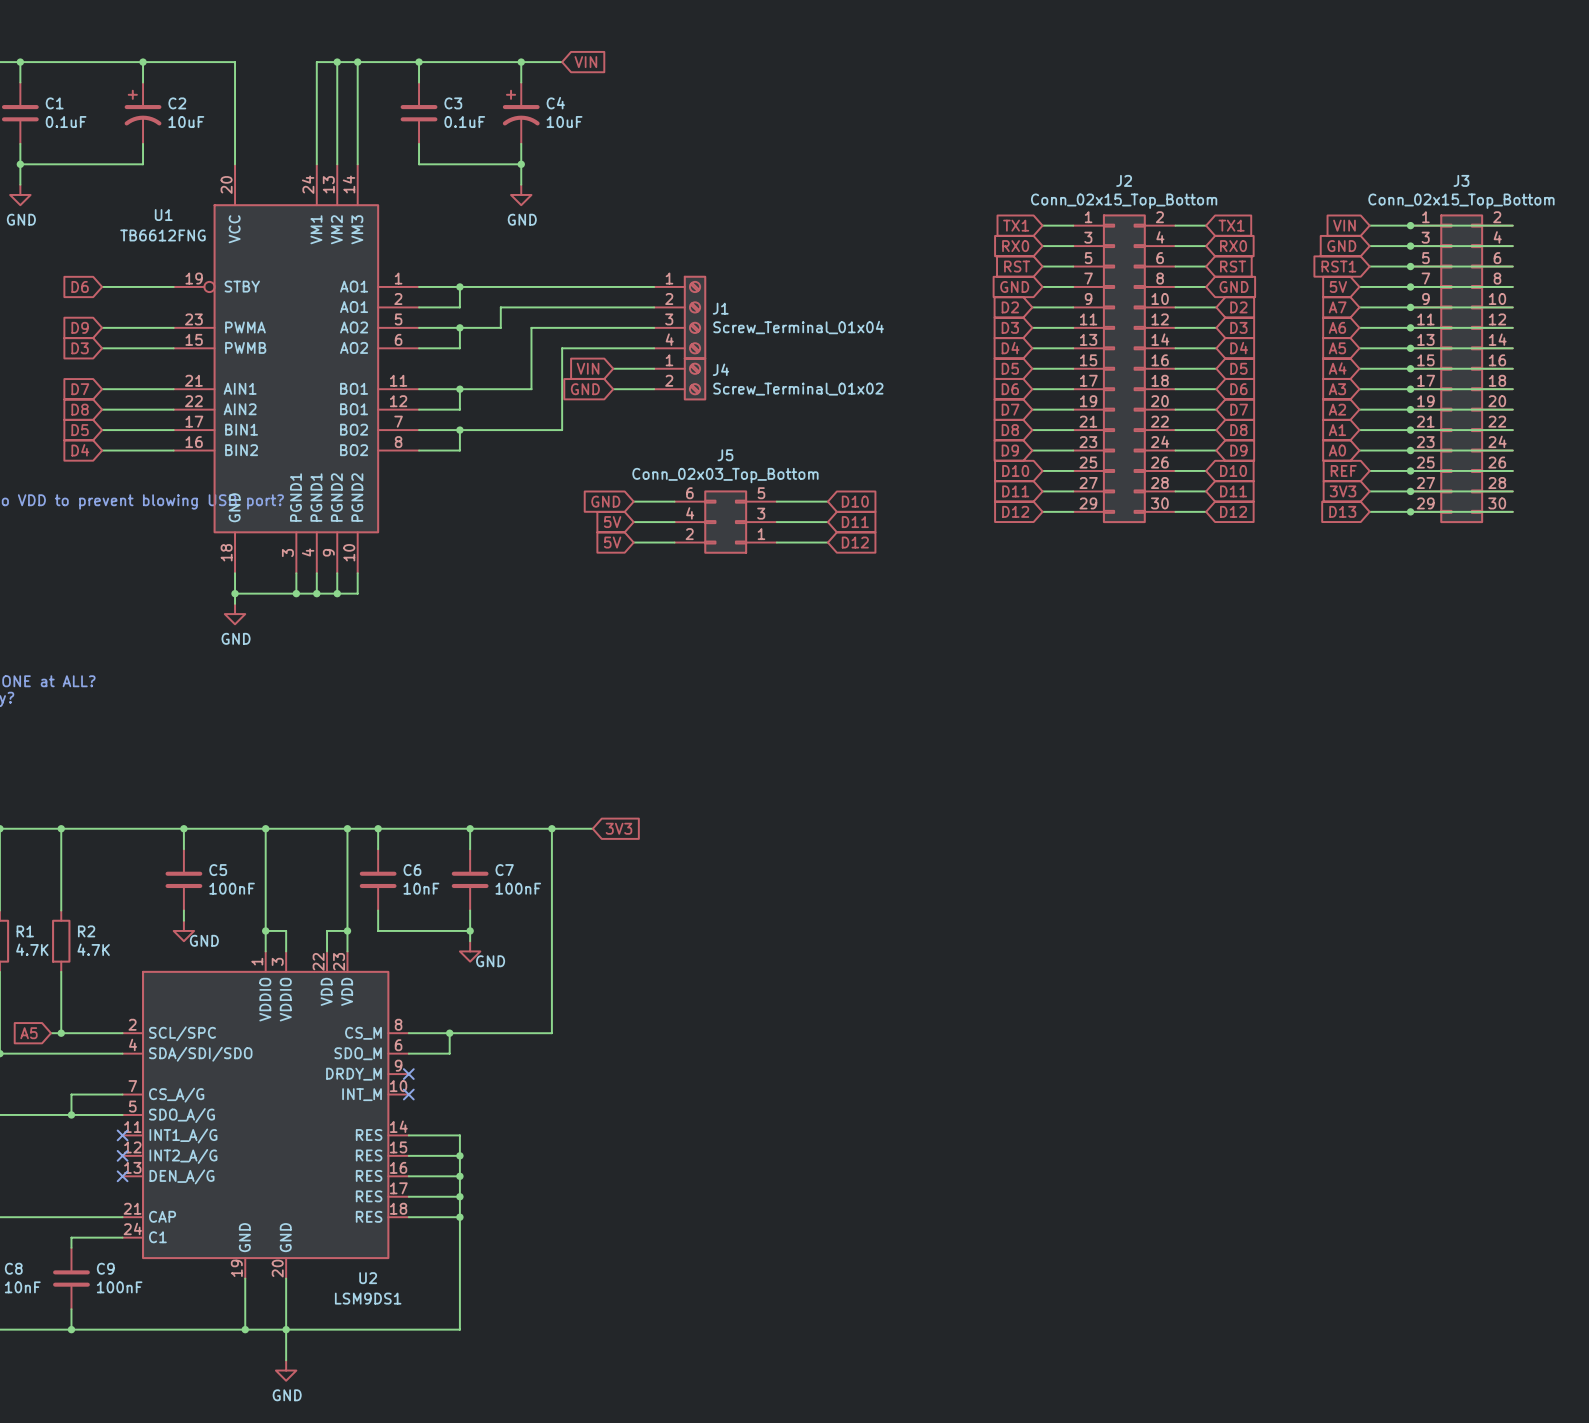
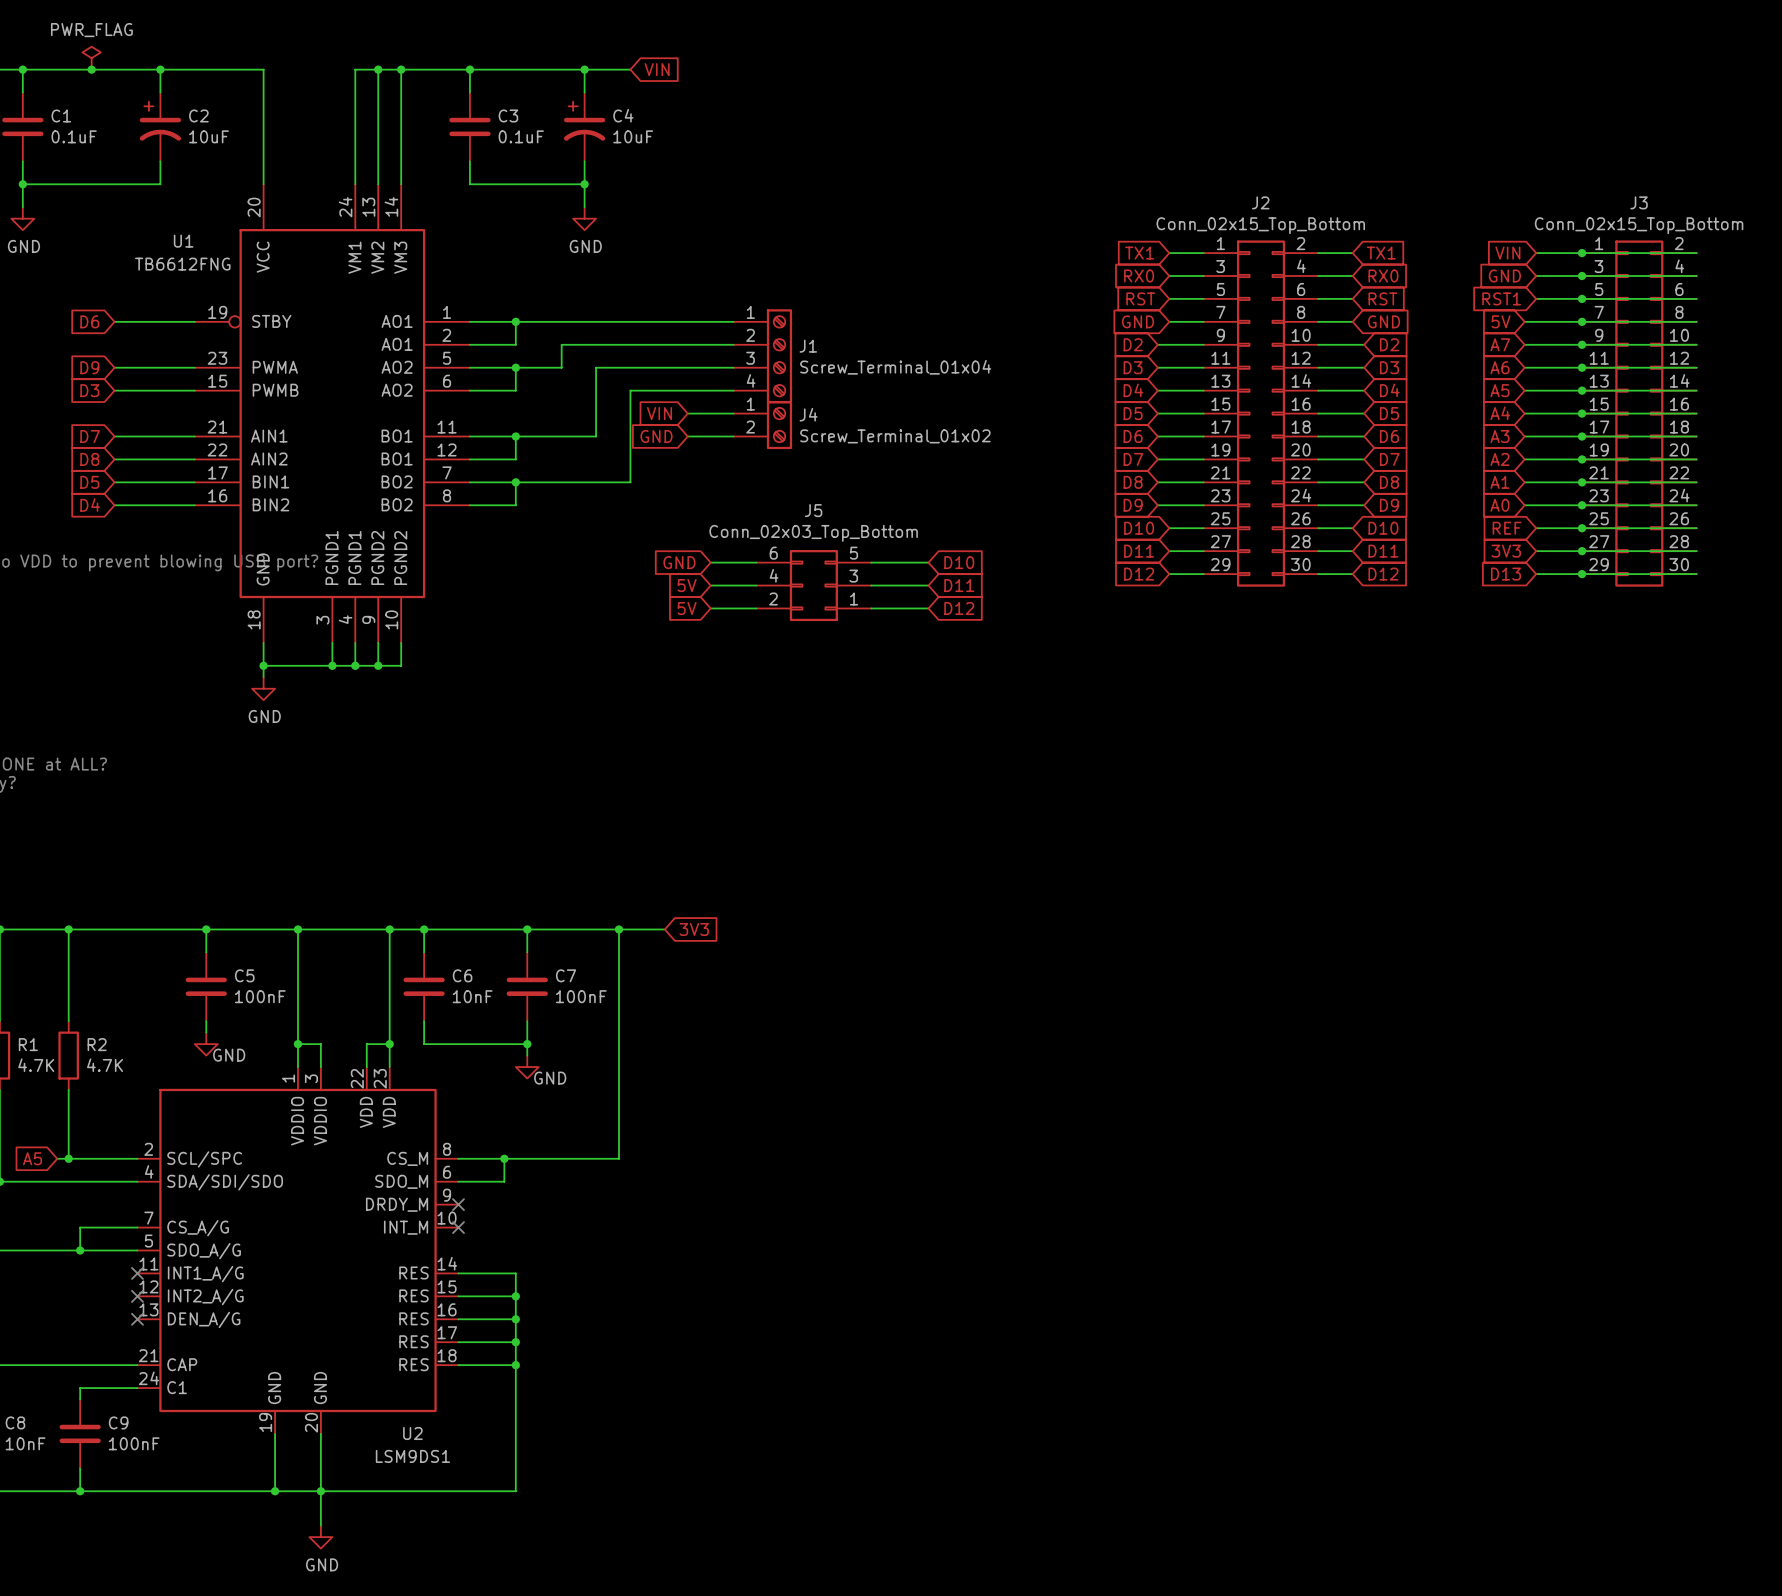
power symbol: none -> PWR_FLAG (91, 58)
junction: none -> (91, 69)

